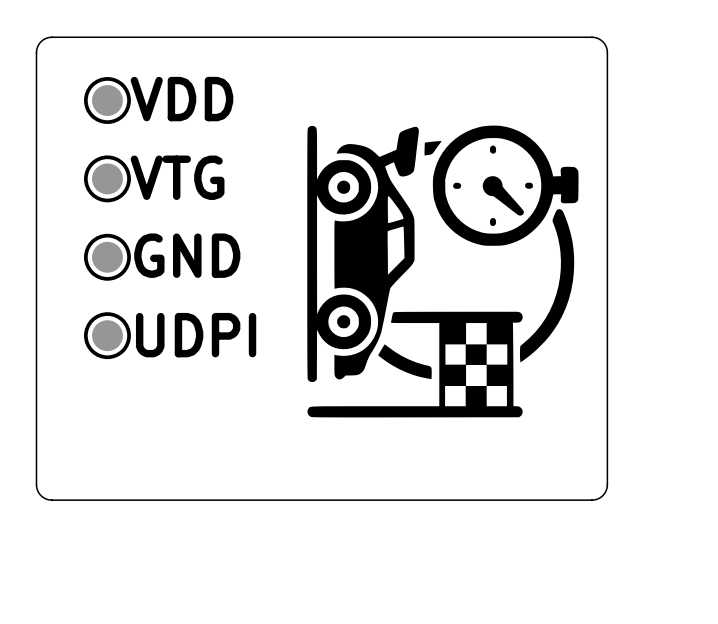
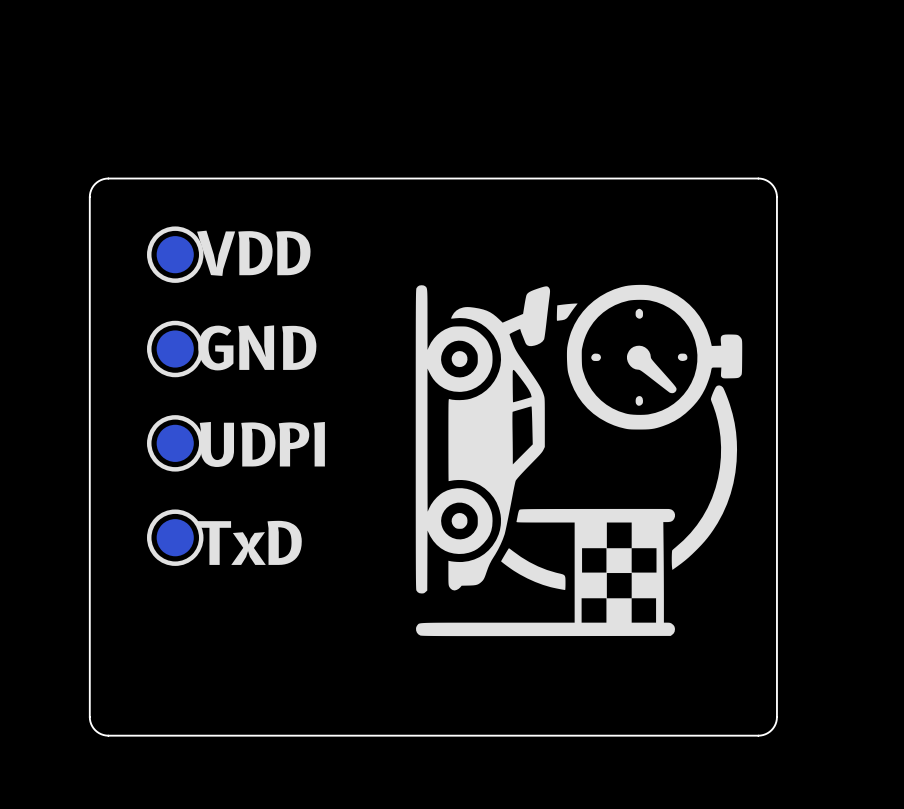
text: VTG (177, 177) -> GND (257, 347)
text: GND (187, 255) -> UDPI (262, 444)
text: UDPI (196, 335) -> TxD (249, 542)

